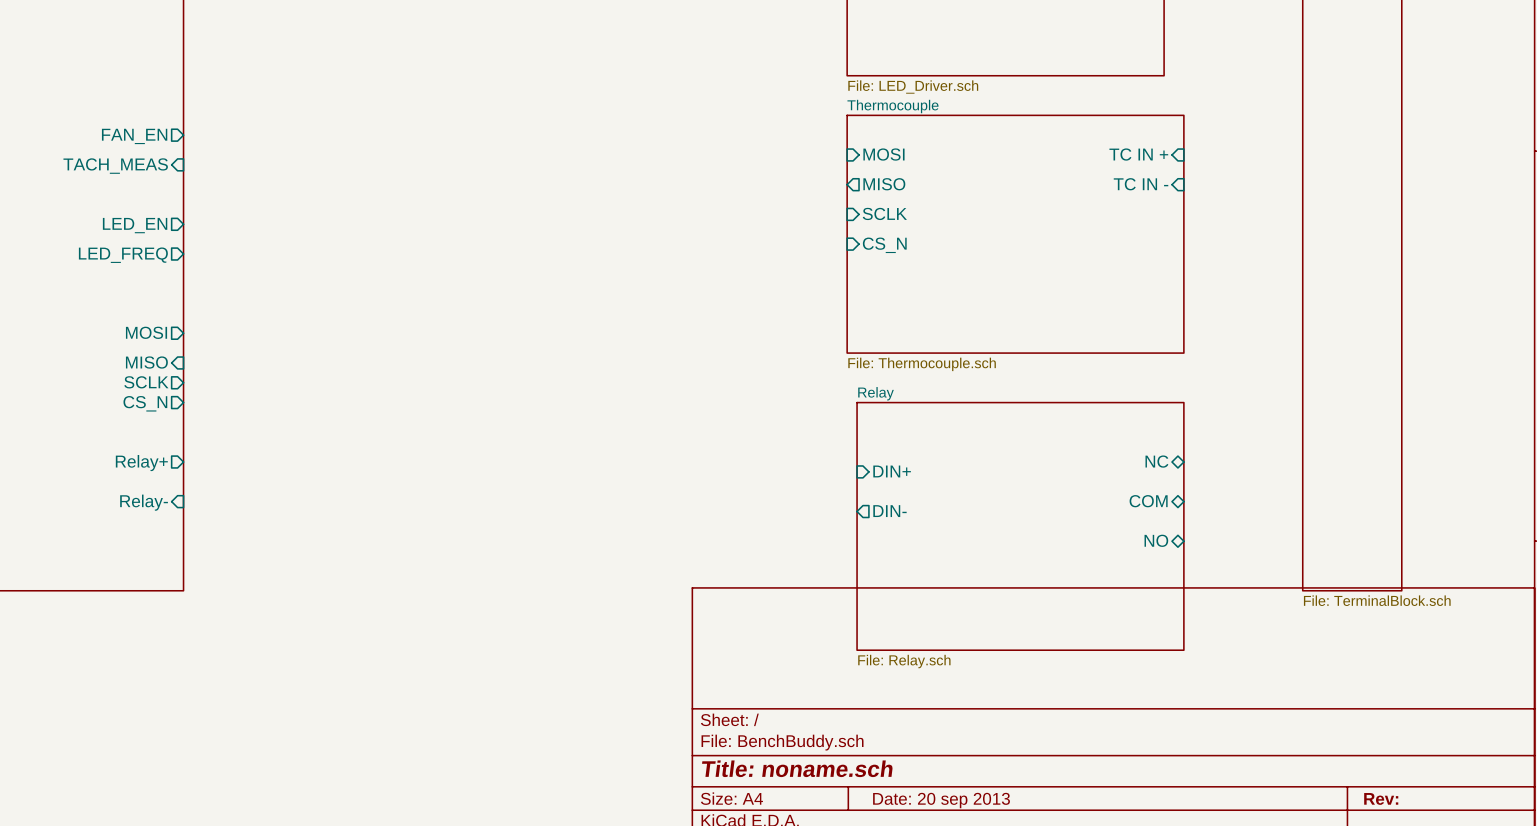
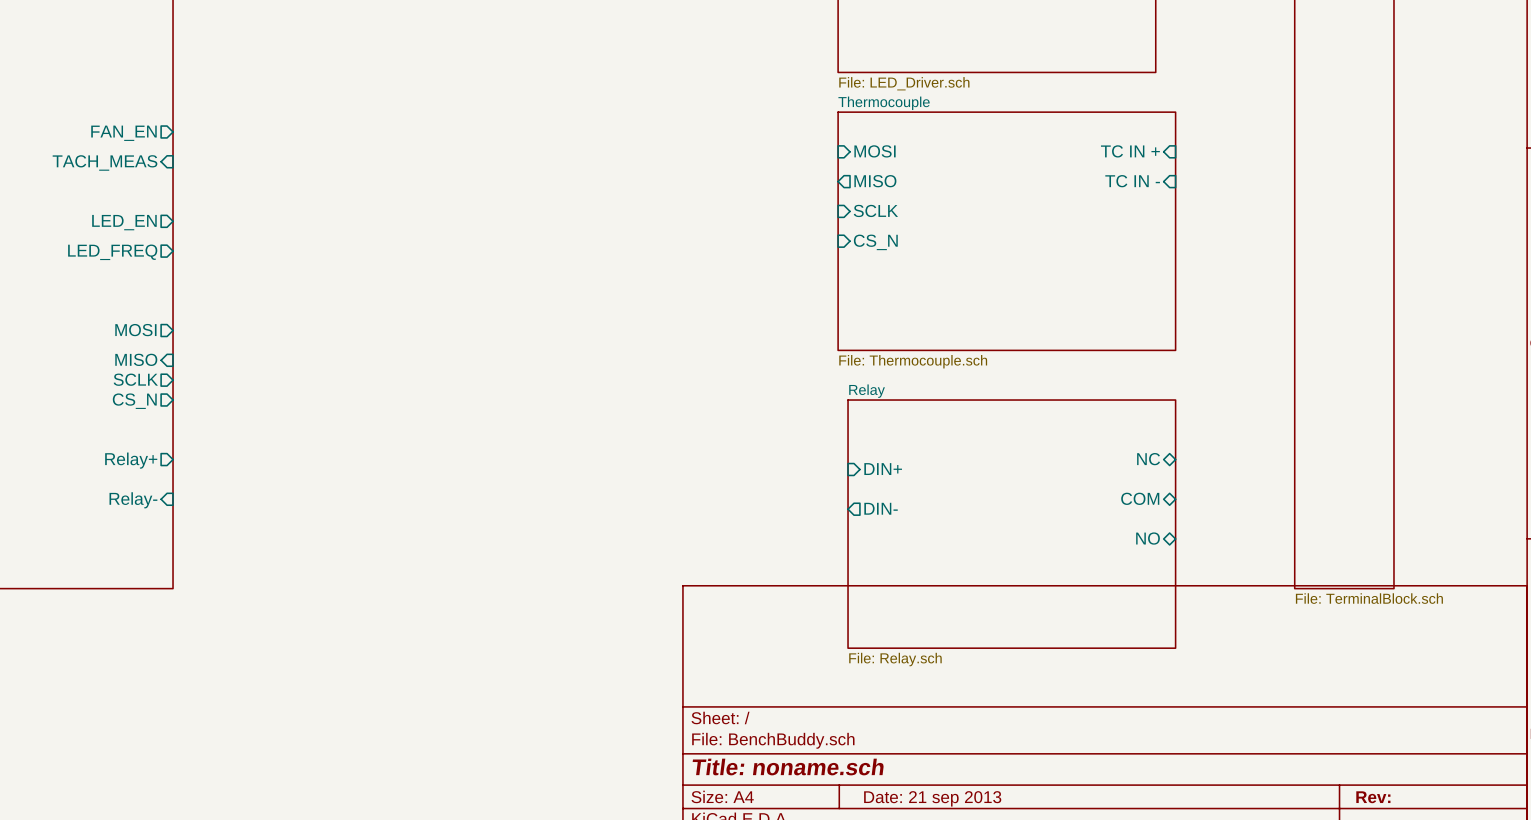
title block: Date: 20 sep 2013 (941, 800) -> Date: 21 sep 2013 (932, 798)

